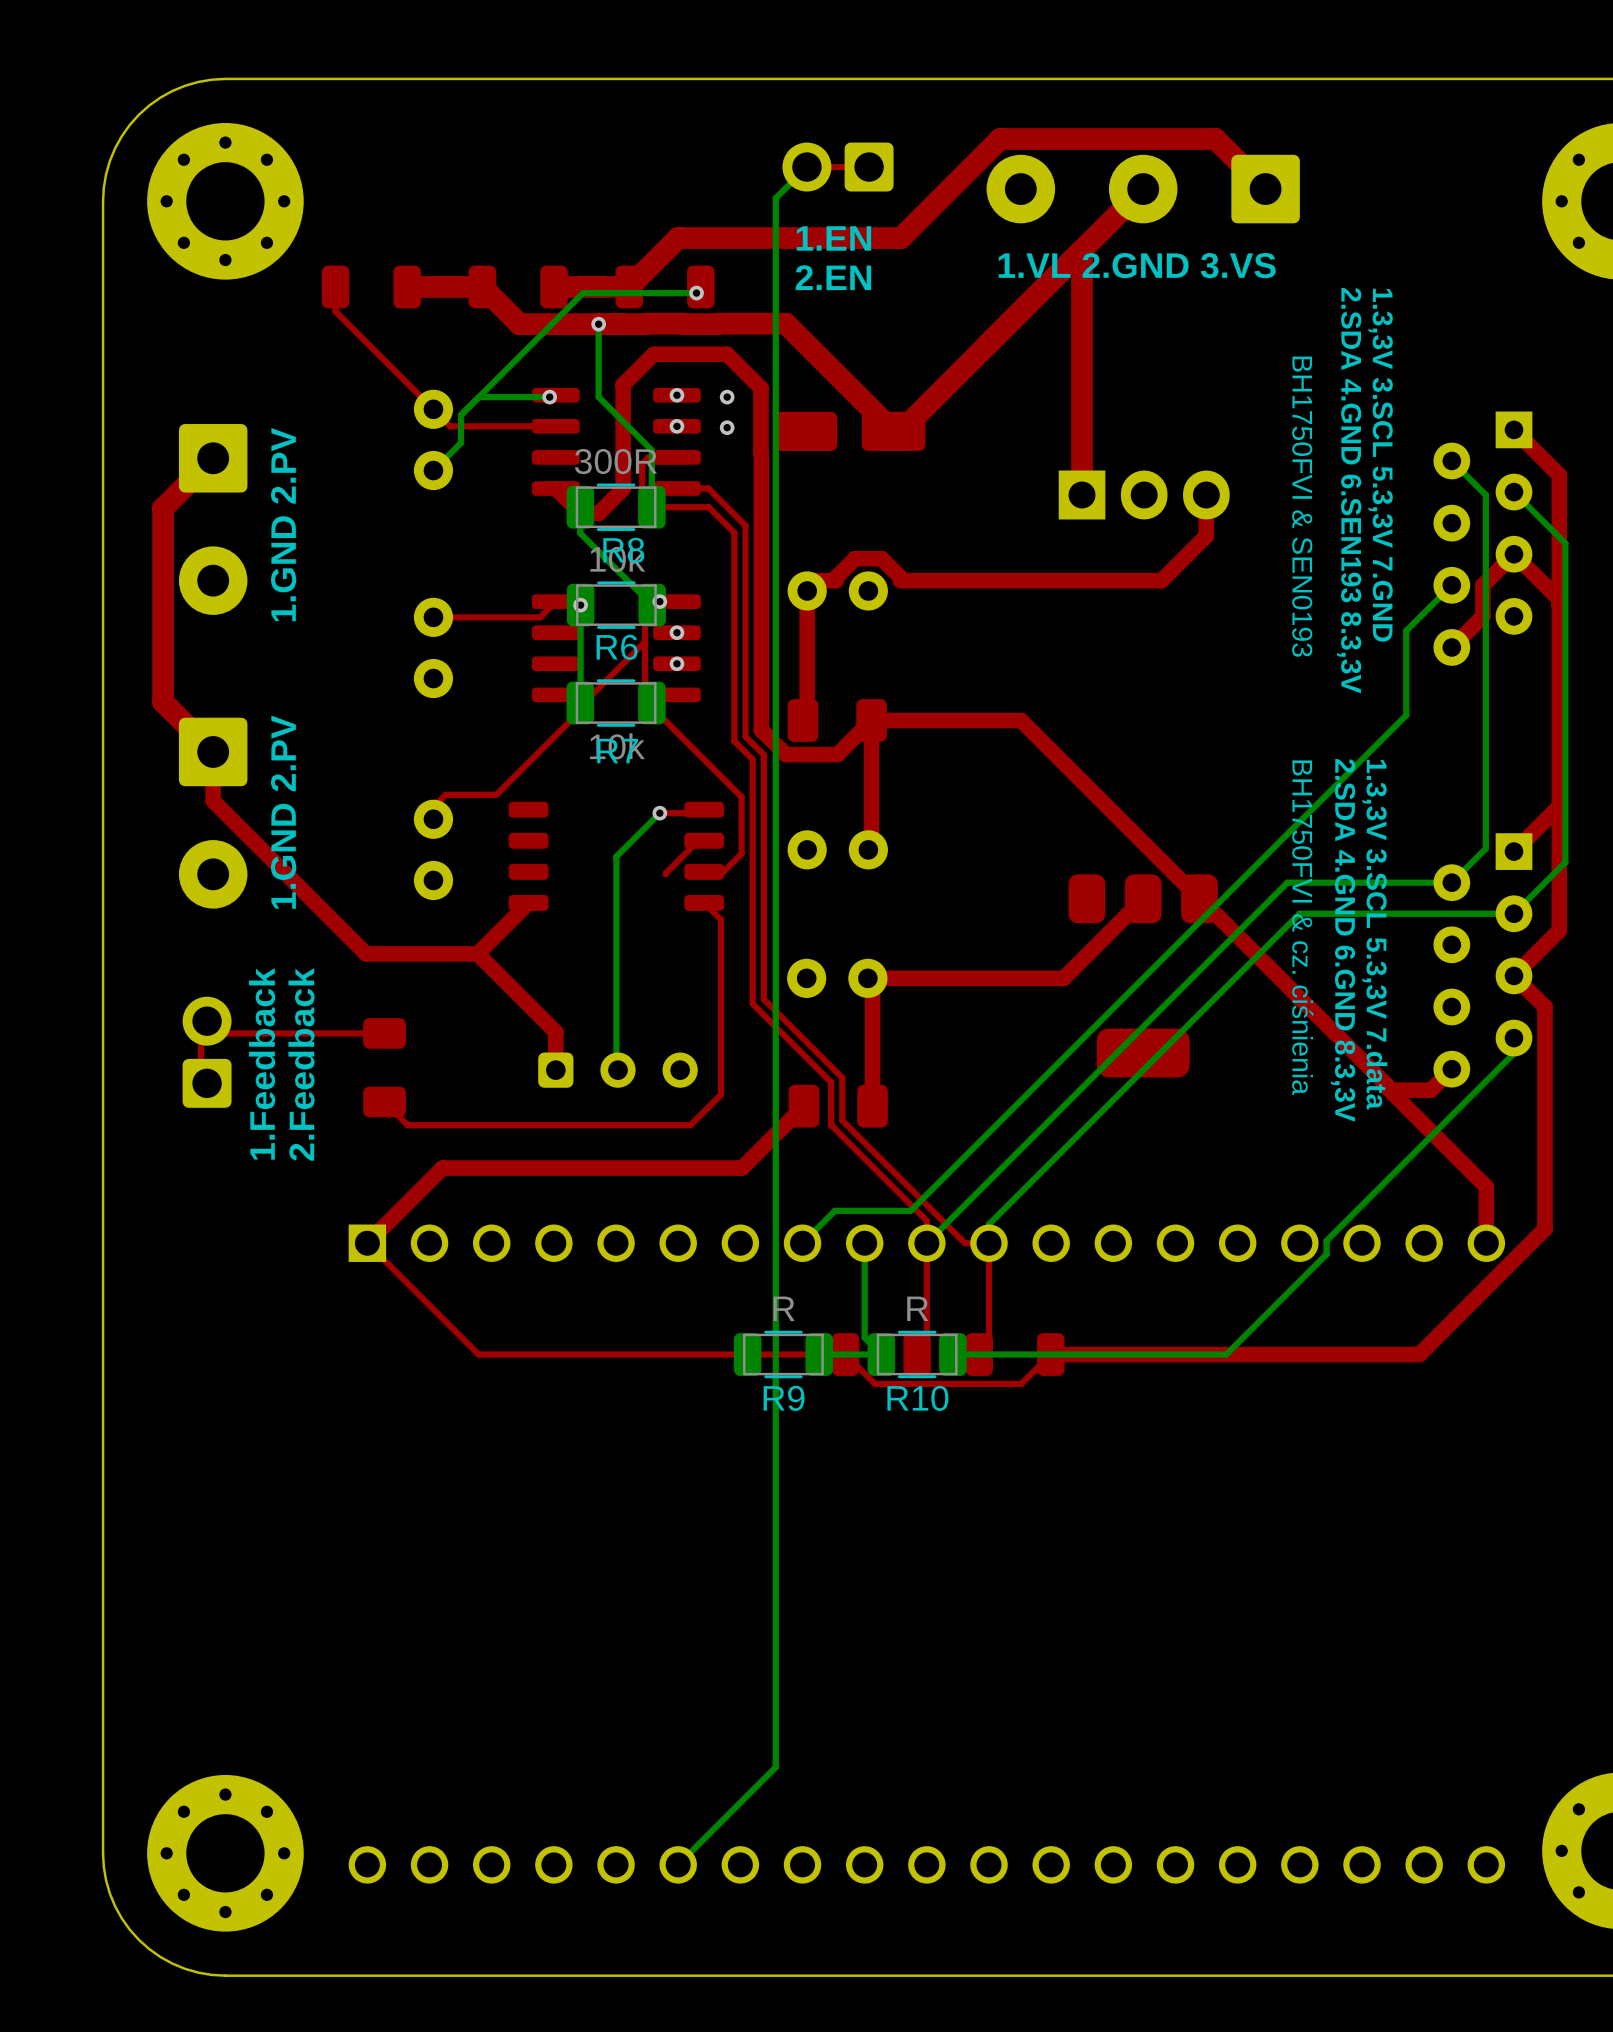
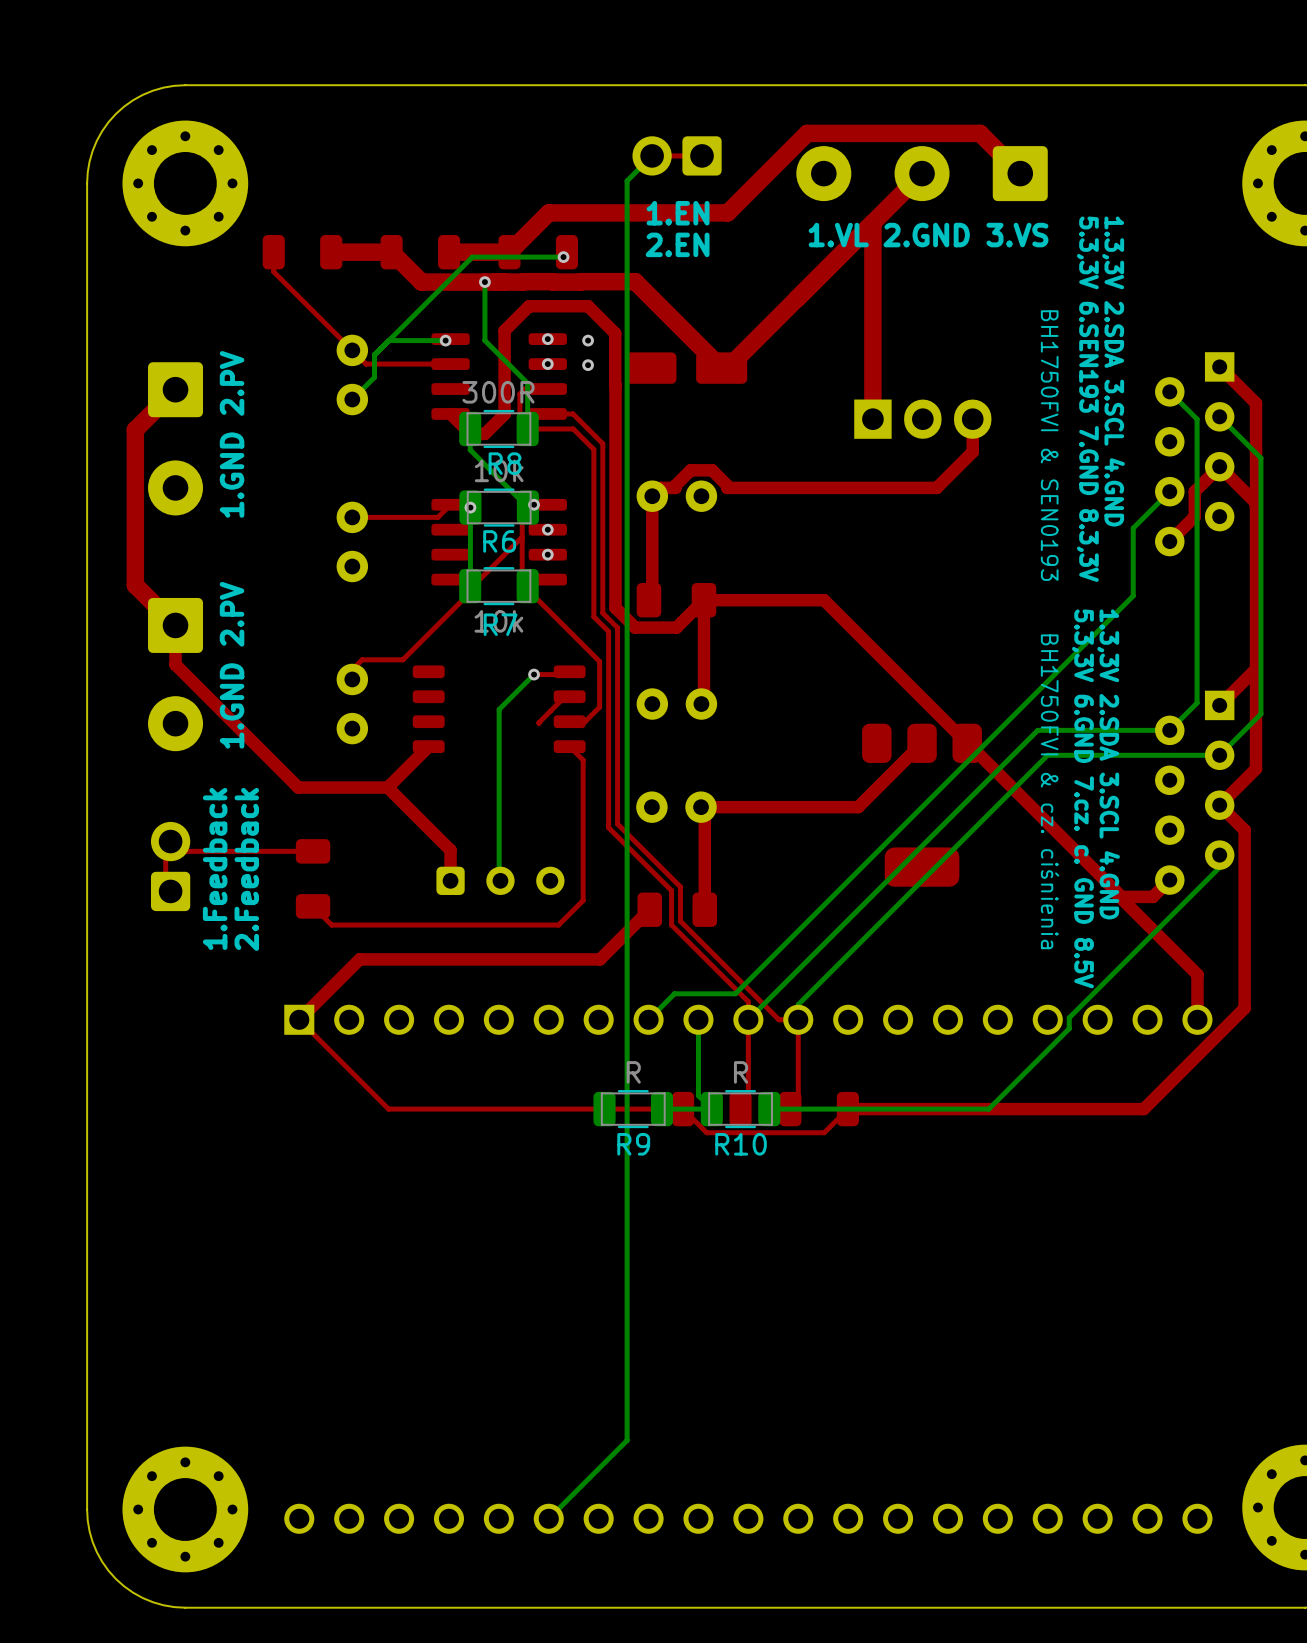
text: 1.3,3V 3.SCL 5.3,3V 7.GND (1380, 465) -> 1.3,3V 2.SDA 3.SCL 4.GND (1113, 371)
text: 2.SDA 4.GND 6.SEN193 8.3,3V (1349, 490) -> 5.3,3V 6.SEN193 7.GND 8.3,3V (1087, 399)
text: none -> 1.3,3V 2.SDA 3.SCL 4.GND (1108, 764)
text: 1.3,3V 3.SCL 5.3,3V 7.data (1374, 934) -> none
text: none -> 5.3,3V 6.GND 7.cz. c. GND 8.5V (1082, 798)
text: 2.SDA 4.GND 6.GND 8.3,3V (1343, 940) -> none

